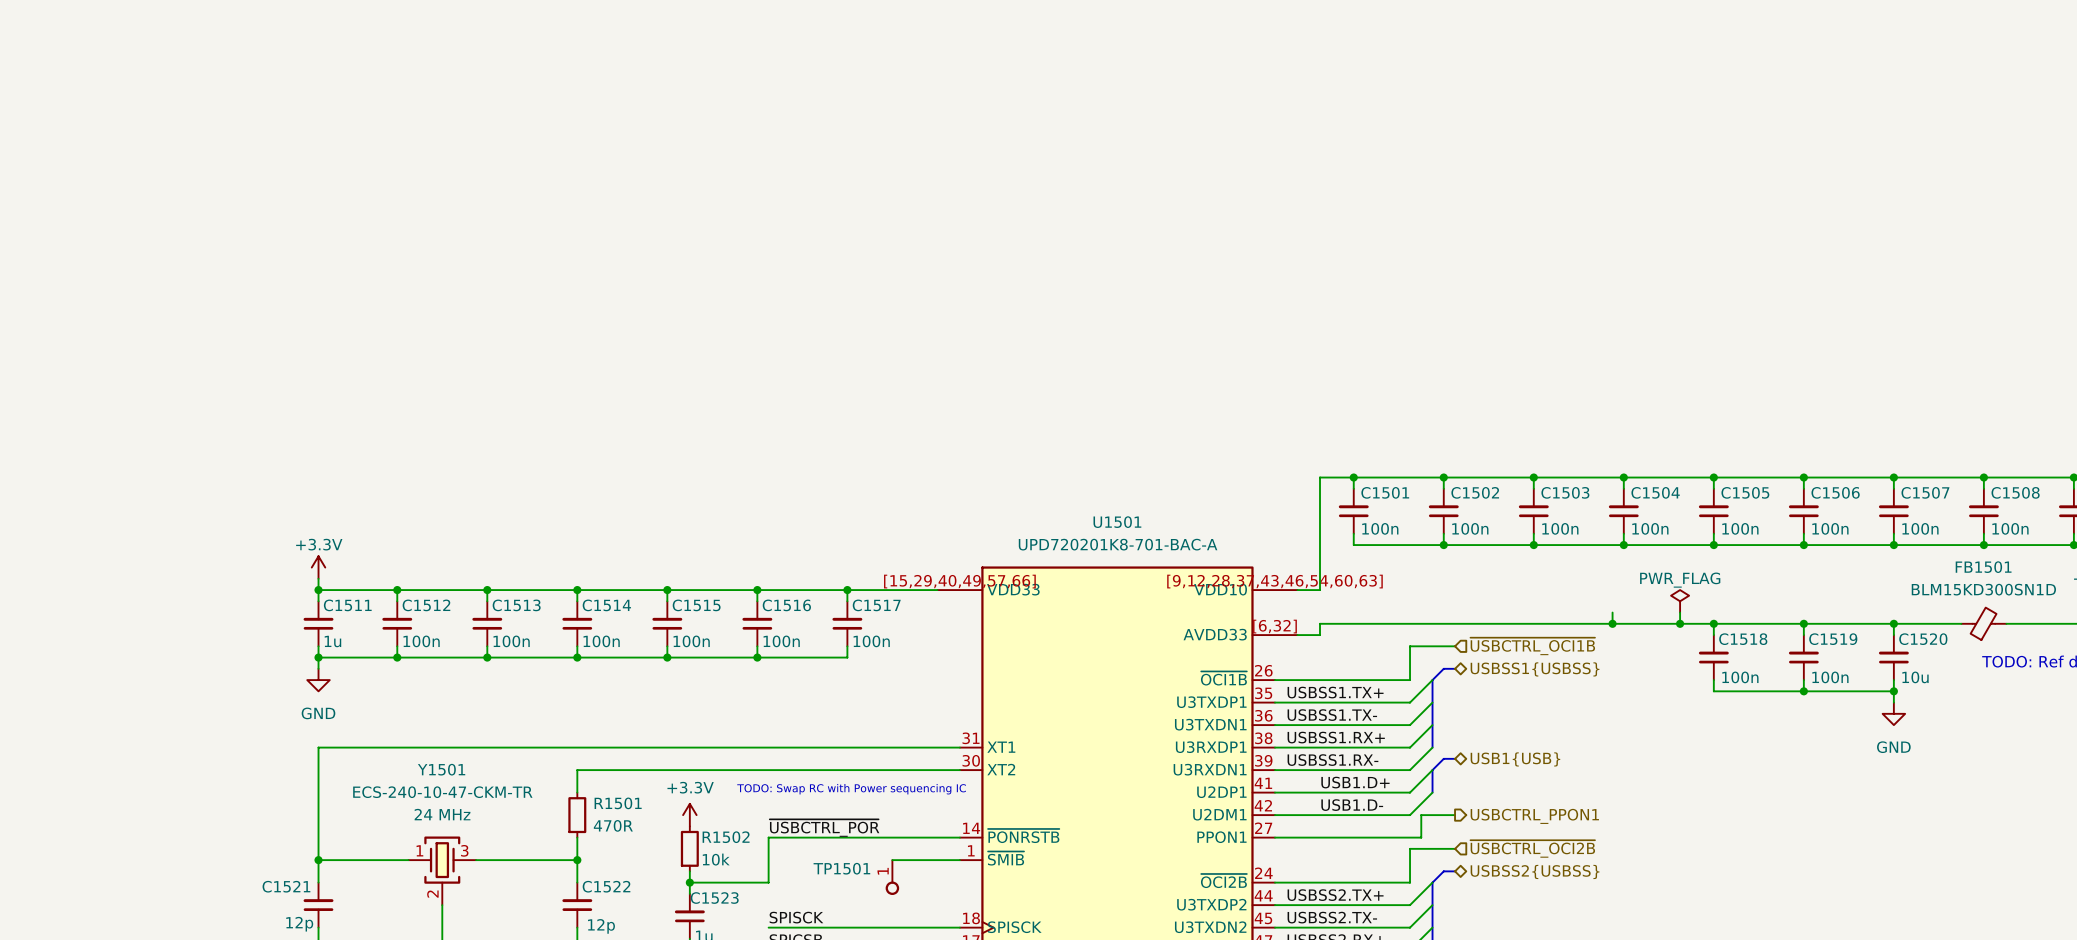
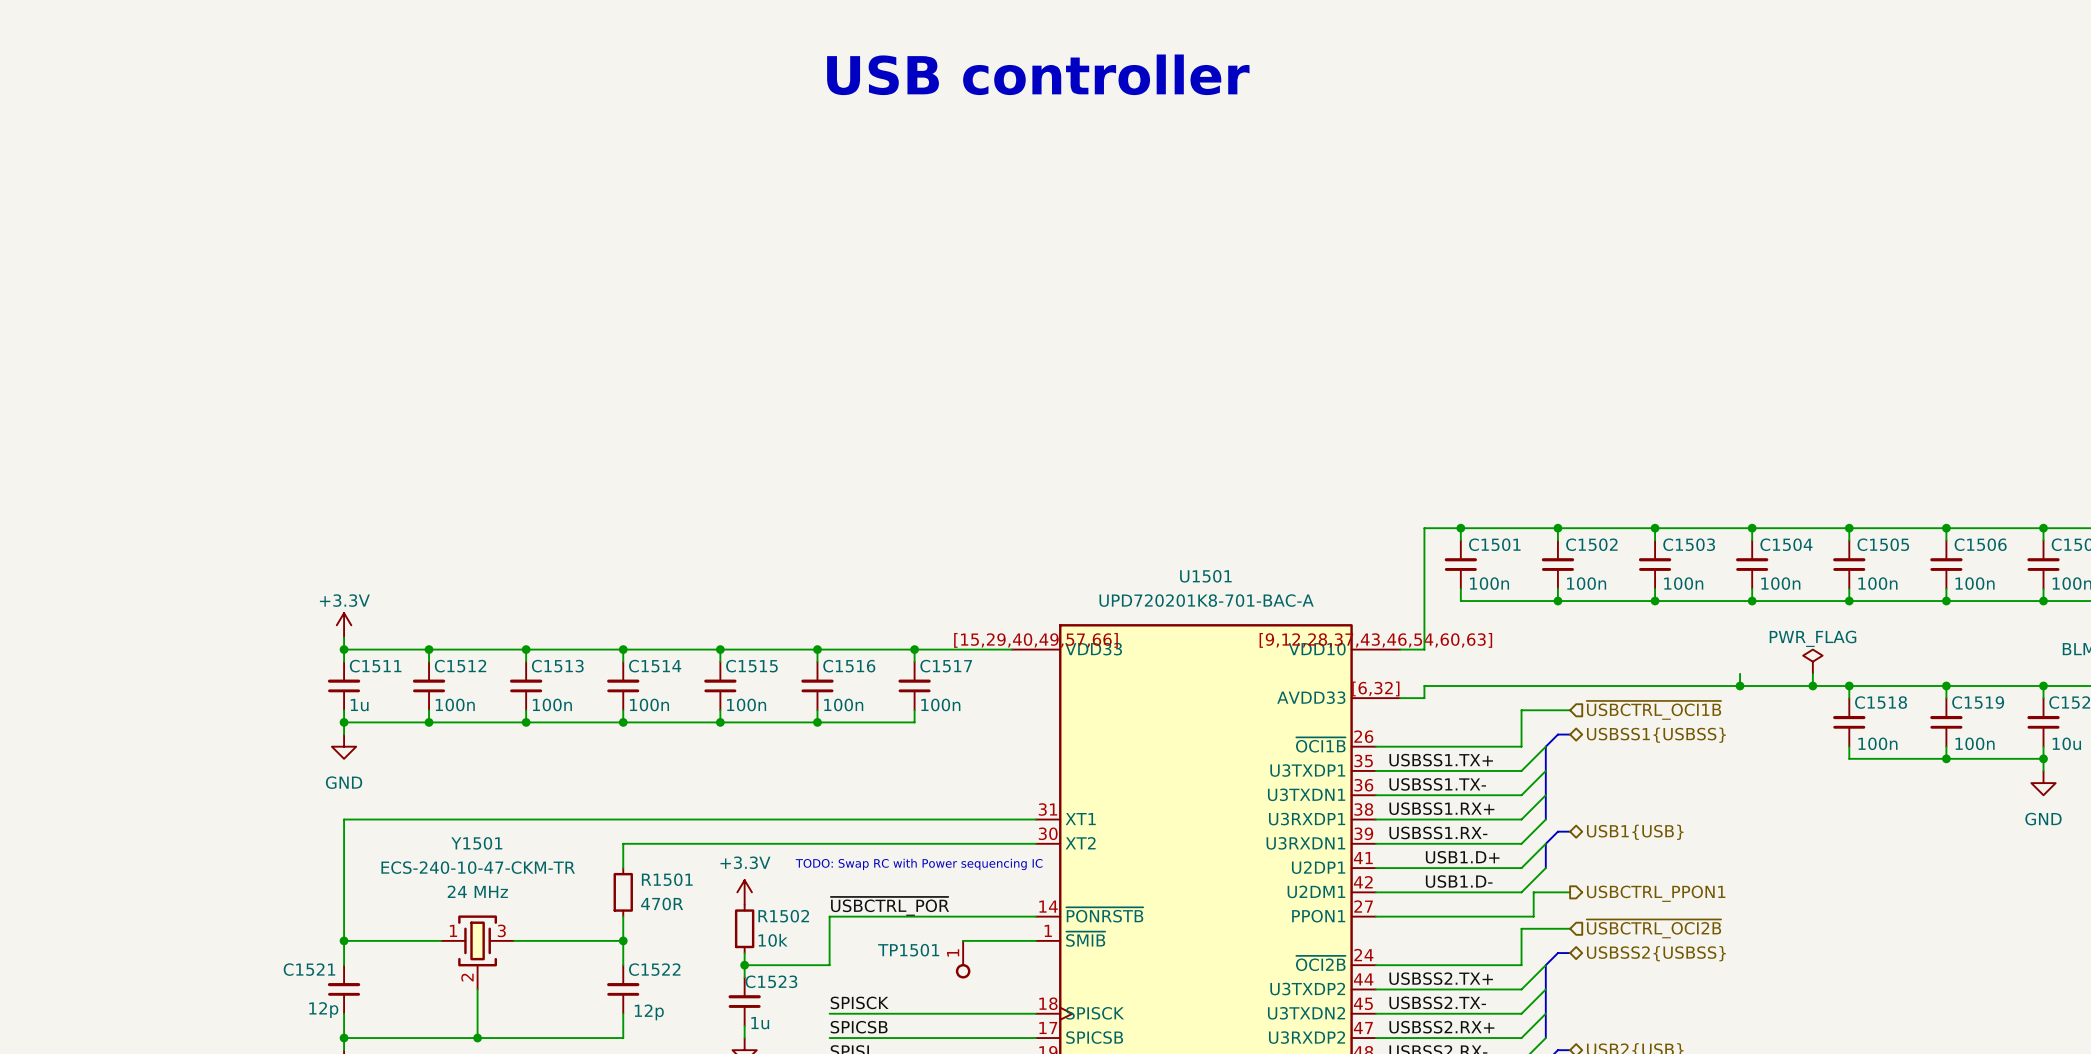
text: none -> USB controller (1038, 74)

